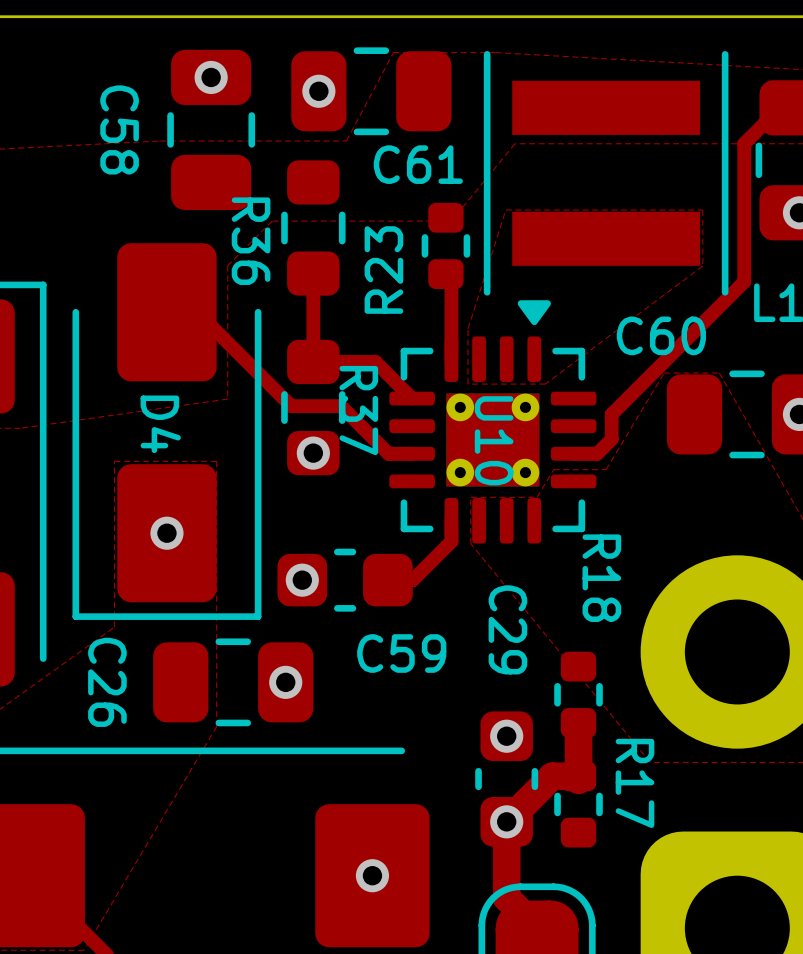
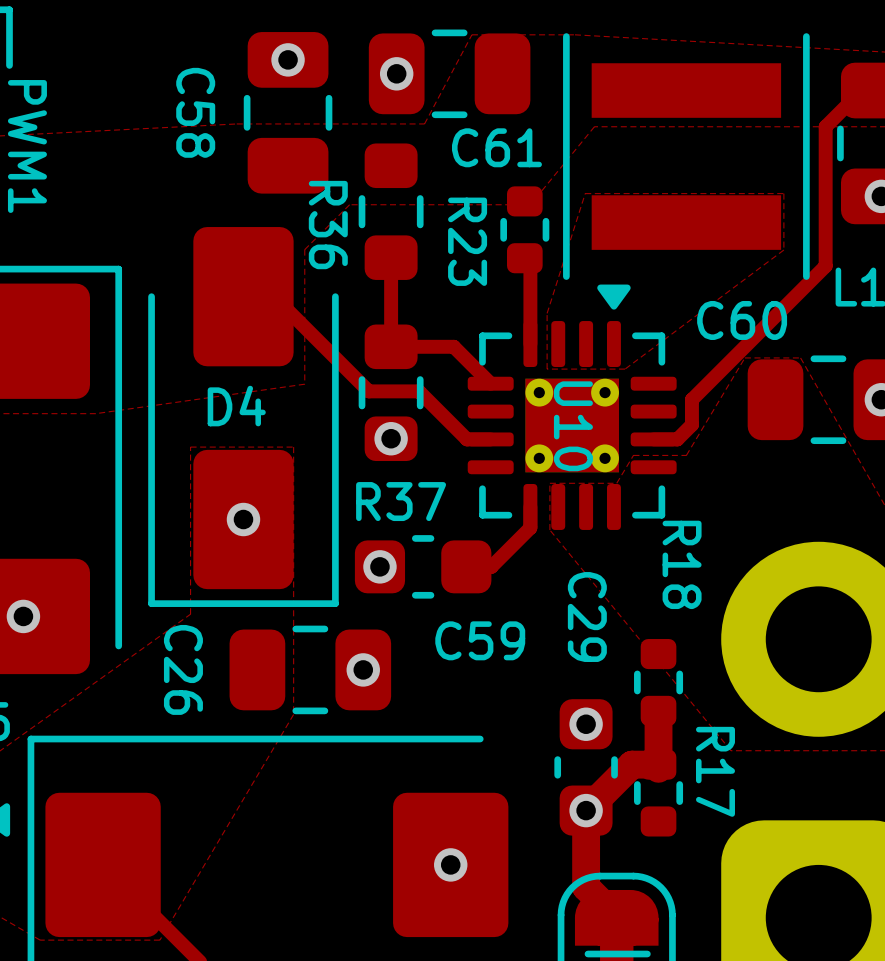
text: none -> R23 (467, 241)
R23 name: R23 (383, 270) -> none
R37 name rotation: 0° (358, 410) -> 90° counterclockwise (401, 501)
D4 name rotation: 0° (160, 424) -> 90° counterclockwise (236, 406)

